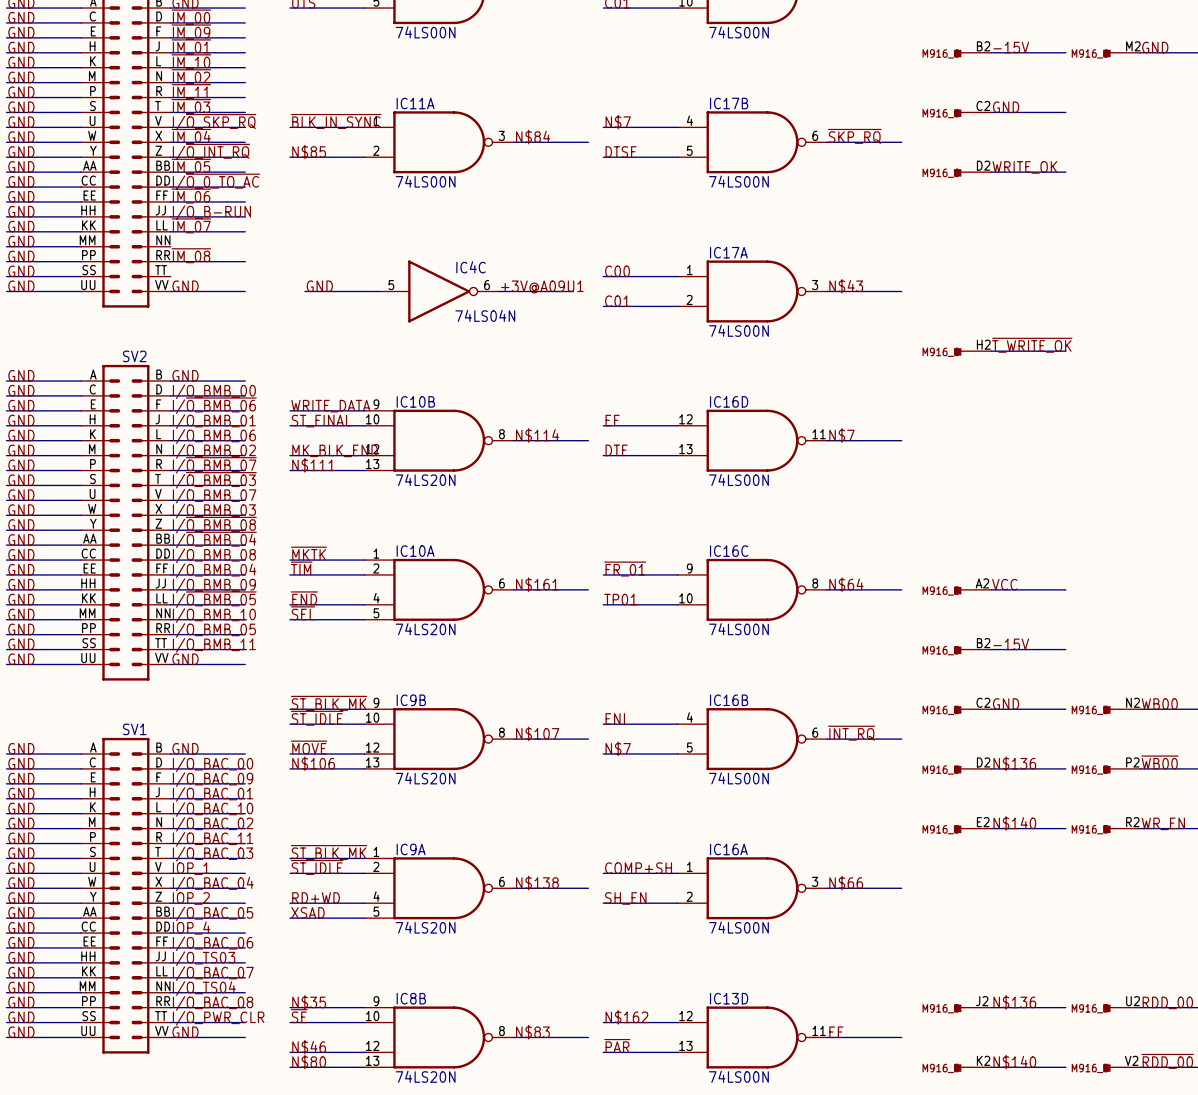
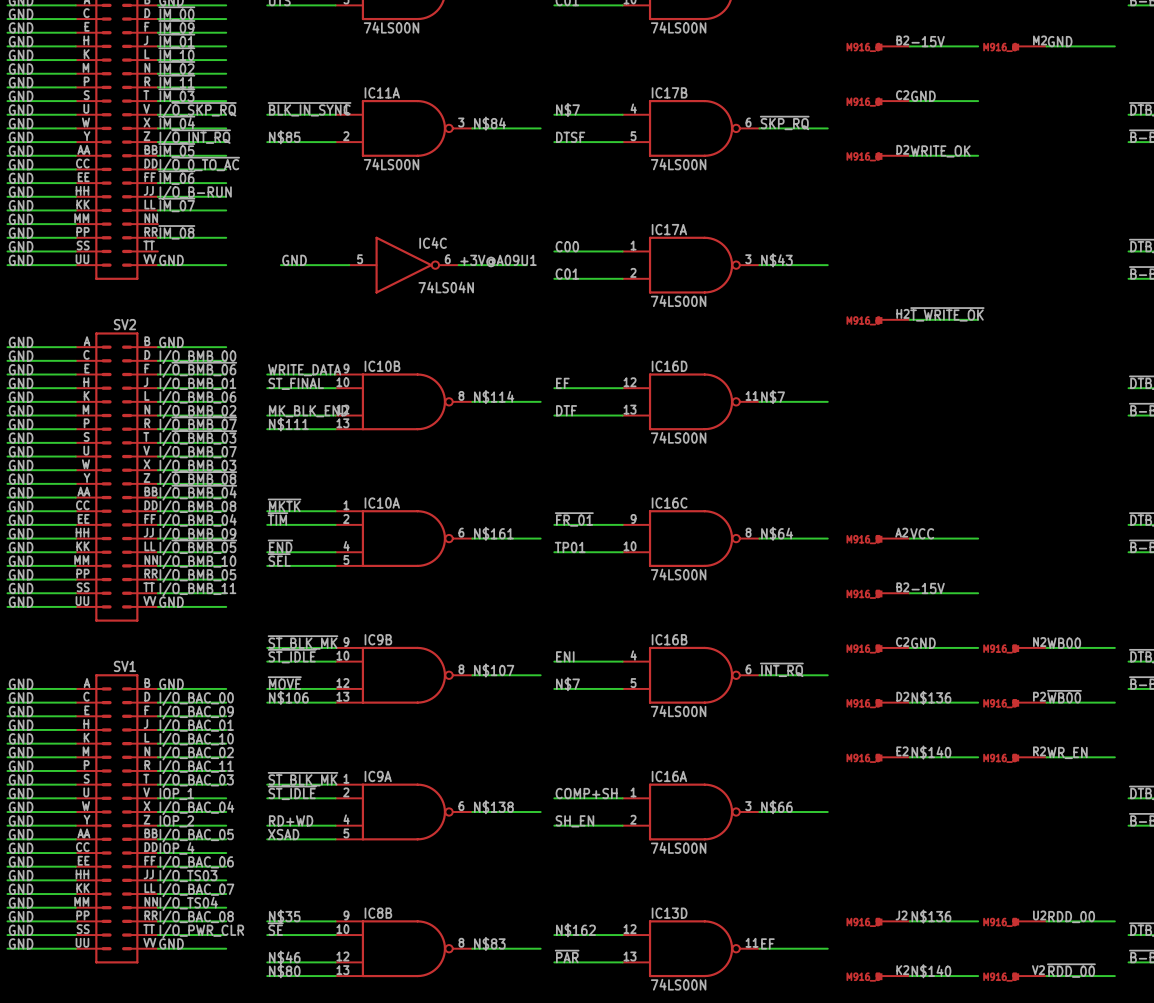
IC10B value: 74LS20N (425, 479) -> none
IC10A value: 74LS20N (425, 629) -> none
IC9B value: 74LS20N (425, 778) -> none
IC9A value: 74LS20N (425, 927) -> none
IC8B value: 74LS20N (425, 1076) -> none

